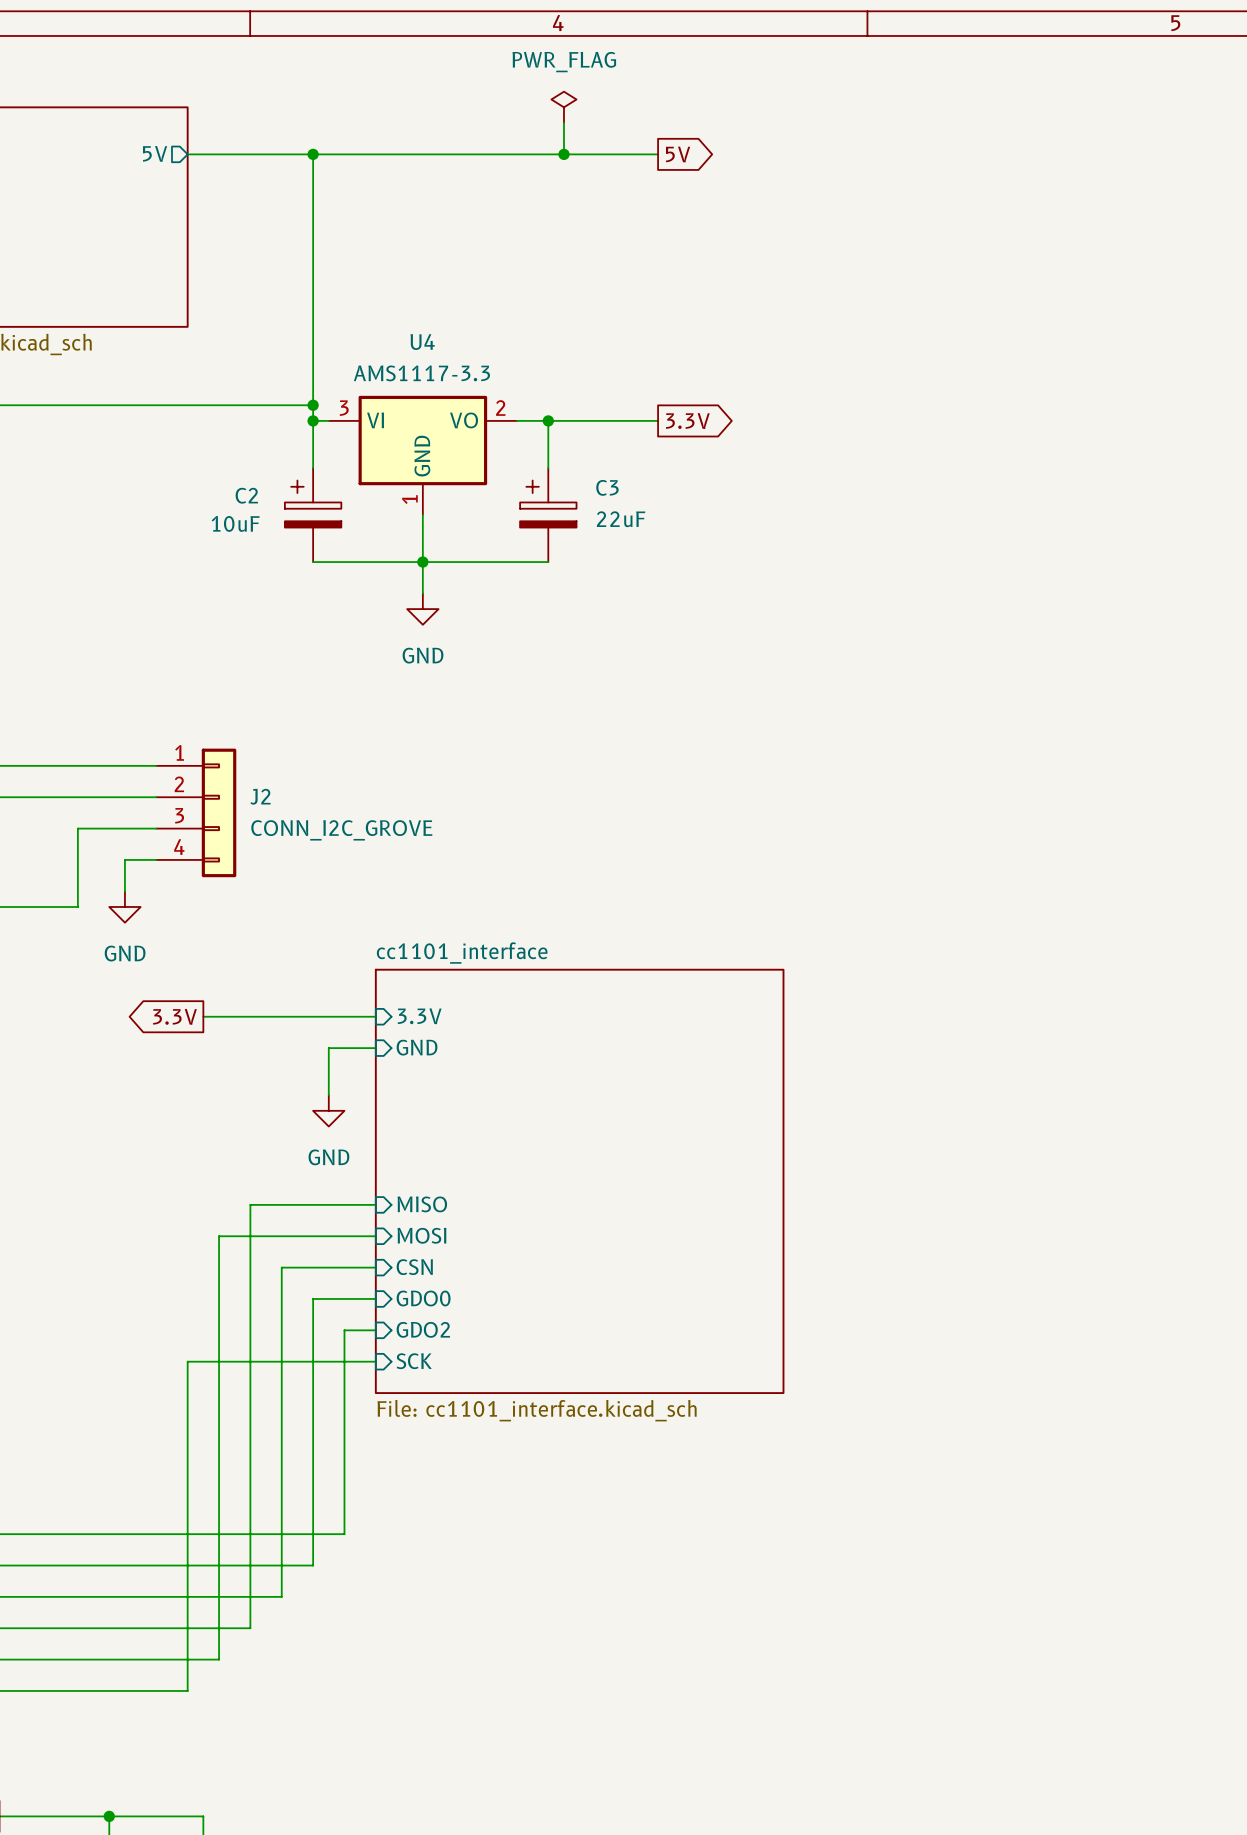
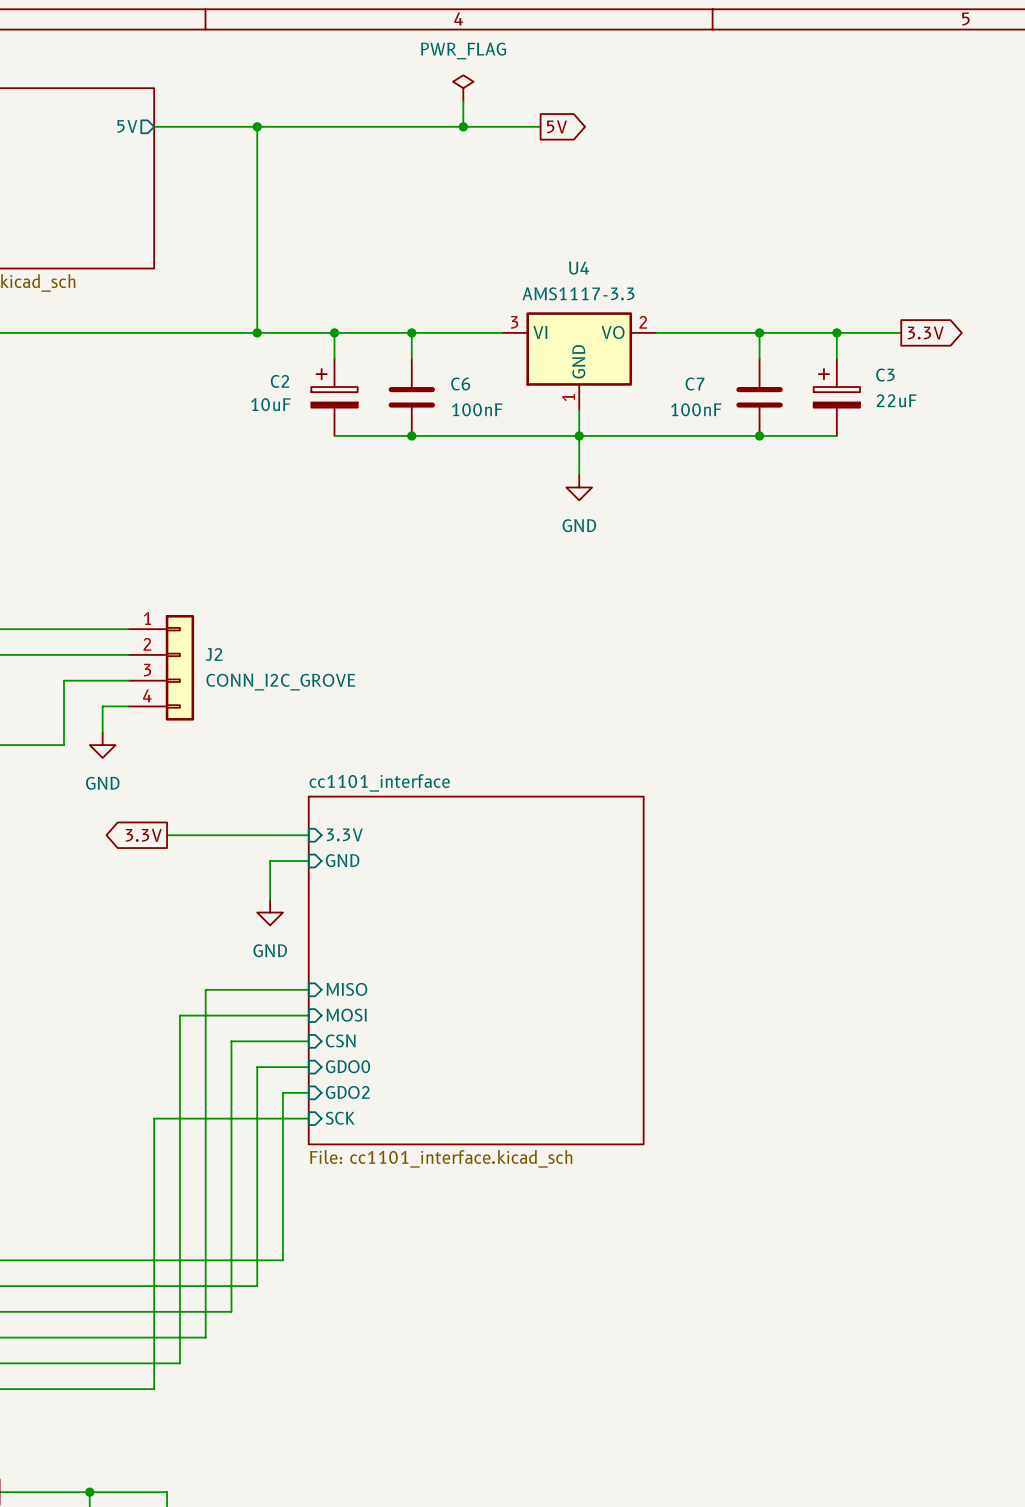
wire: (313, 405) (313, 467) -> (257, 332) (501, 332)
junction: none -> (334, 332)
wire: none -> (411, 332) (411, 358)
wire: none -> (656, 332) (901, 332)
wire: none -> (759, 332) (759, 358)
junction: none -> (759, 332)
wire: none -> (836, 332) (836, 358)
junction: none -> (836, 332)
global label: none -> 3.3V (925, 333)
wire: (313, 420) (328, 420) -> none
junction: (313, 420) -> none
wire: (516, 420) (658, 420) -> none
wire: (548, 420) (548, 467) -> none
junction position: (548, 420) -> (411, 332)
global label: 3.3V (687, 421) -> none
U4 position: (422, 455) -> (579, 361)
C6: none -> 100nF (411, 397)
C7: none -> 100nF (759, 397)
C2 position: (313, 515) -> (334, 397)
wire: (422, 515) (422, 593) -> (579, 410) (579, 474)
C3 position: (548, 515) -> (836, 397)
wire: none -> (334, 435) (836, 435)
junction: none -> (411, 435)
junction: none -> (579, 435)
junction: none -> (759, 435)
wire: (313, 562) (548, 562) -> none
junction: (422, 562) -> none
power symbol position: GND (422, 609) -> GND (579, 487)

